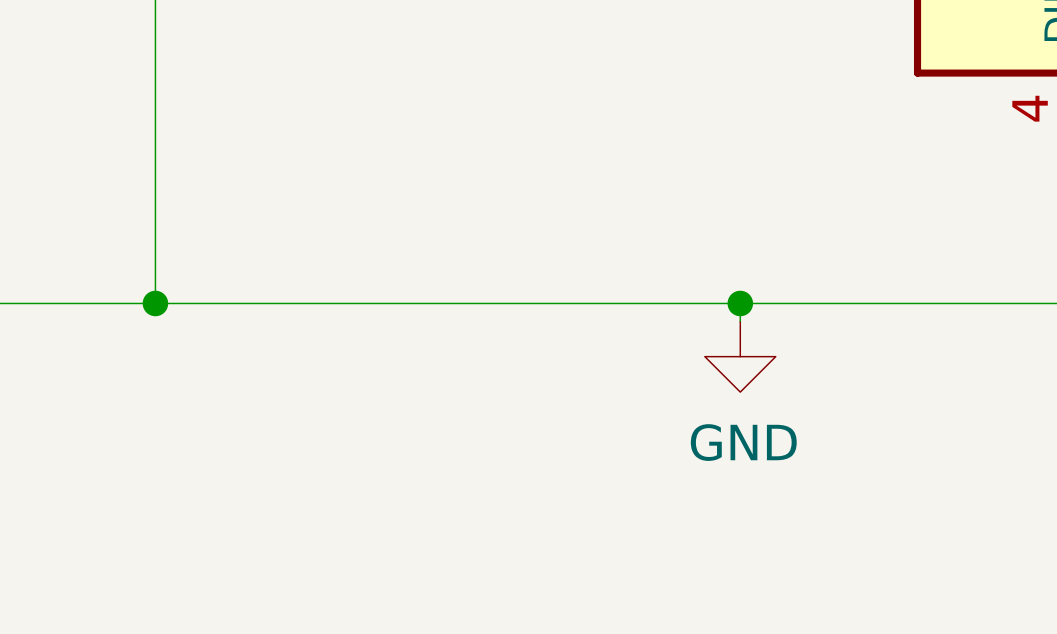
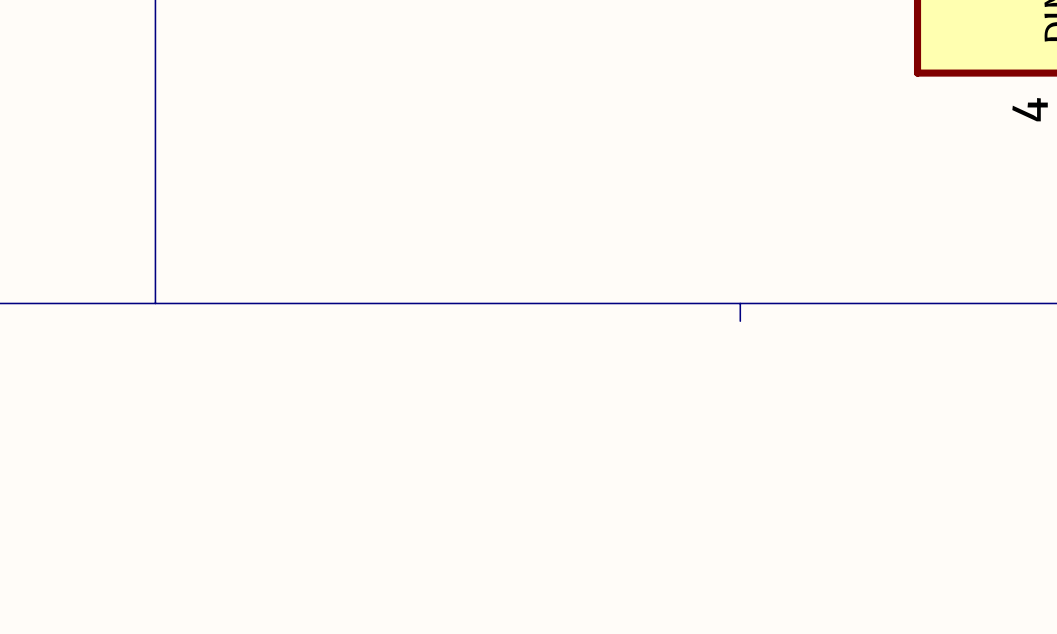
junction: (155, 303) -> none
junction: (740, 303) -> none
power symbol: GND (740, 356) -> none

